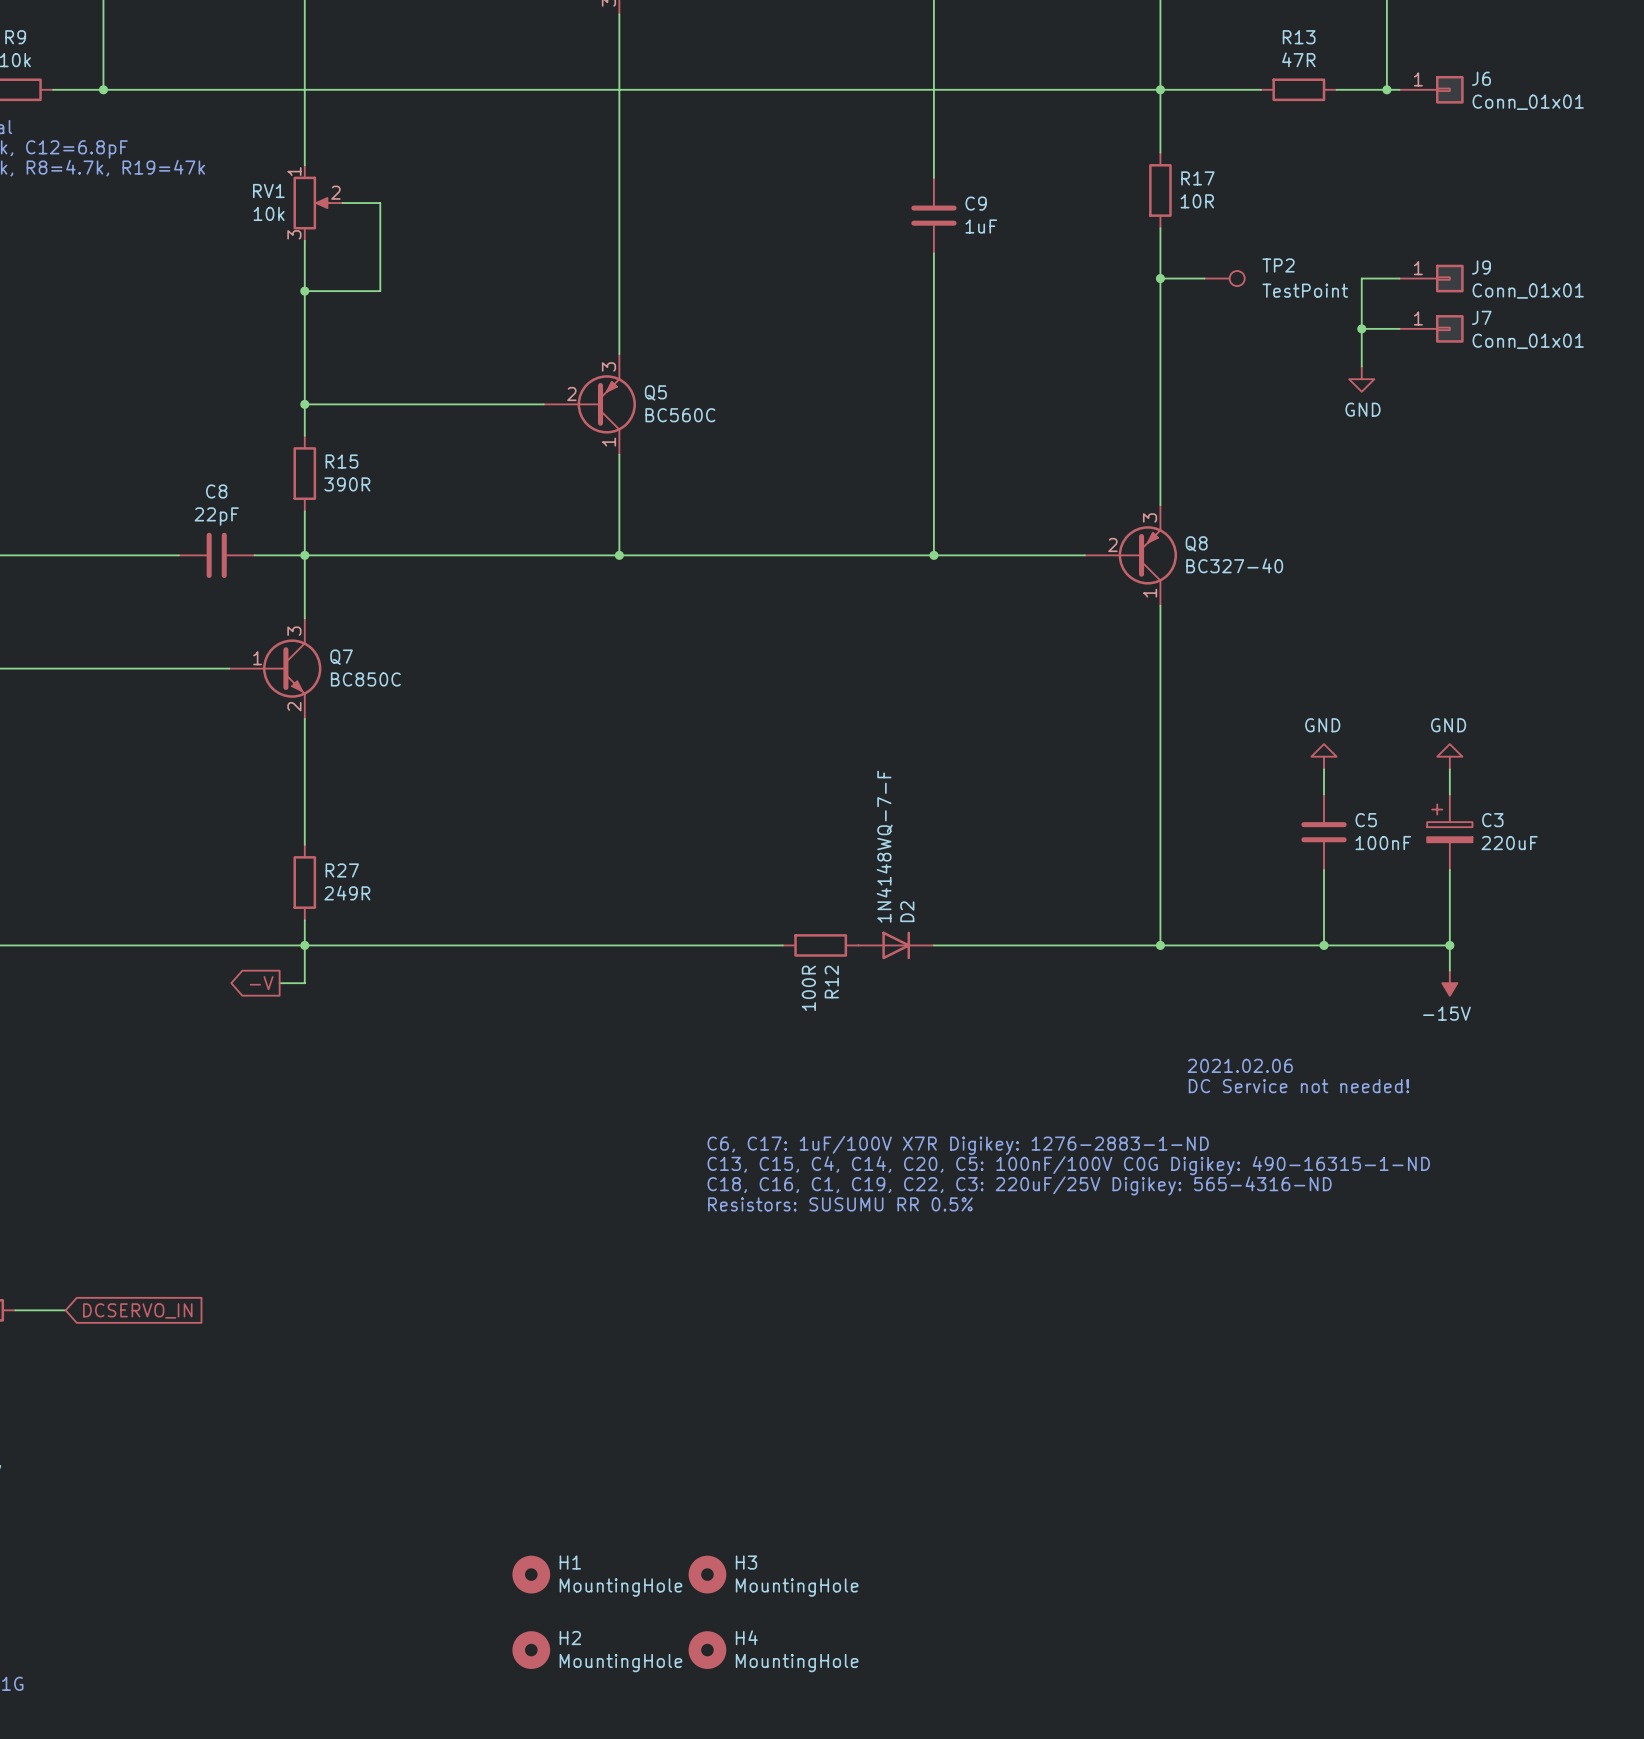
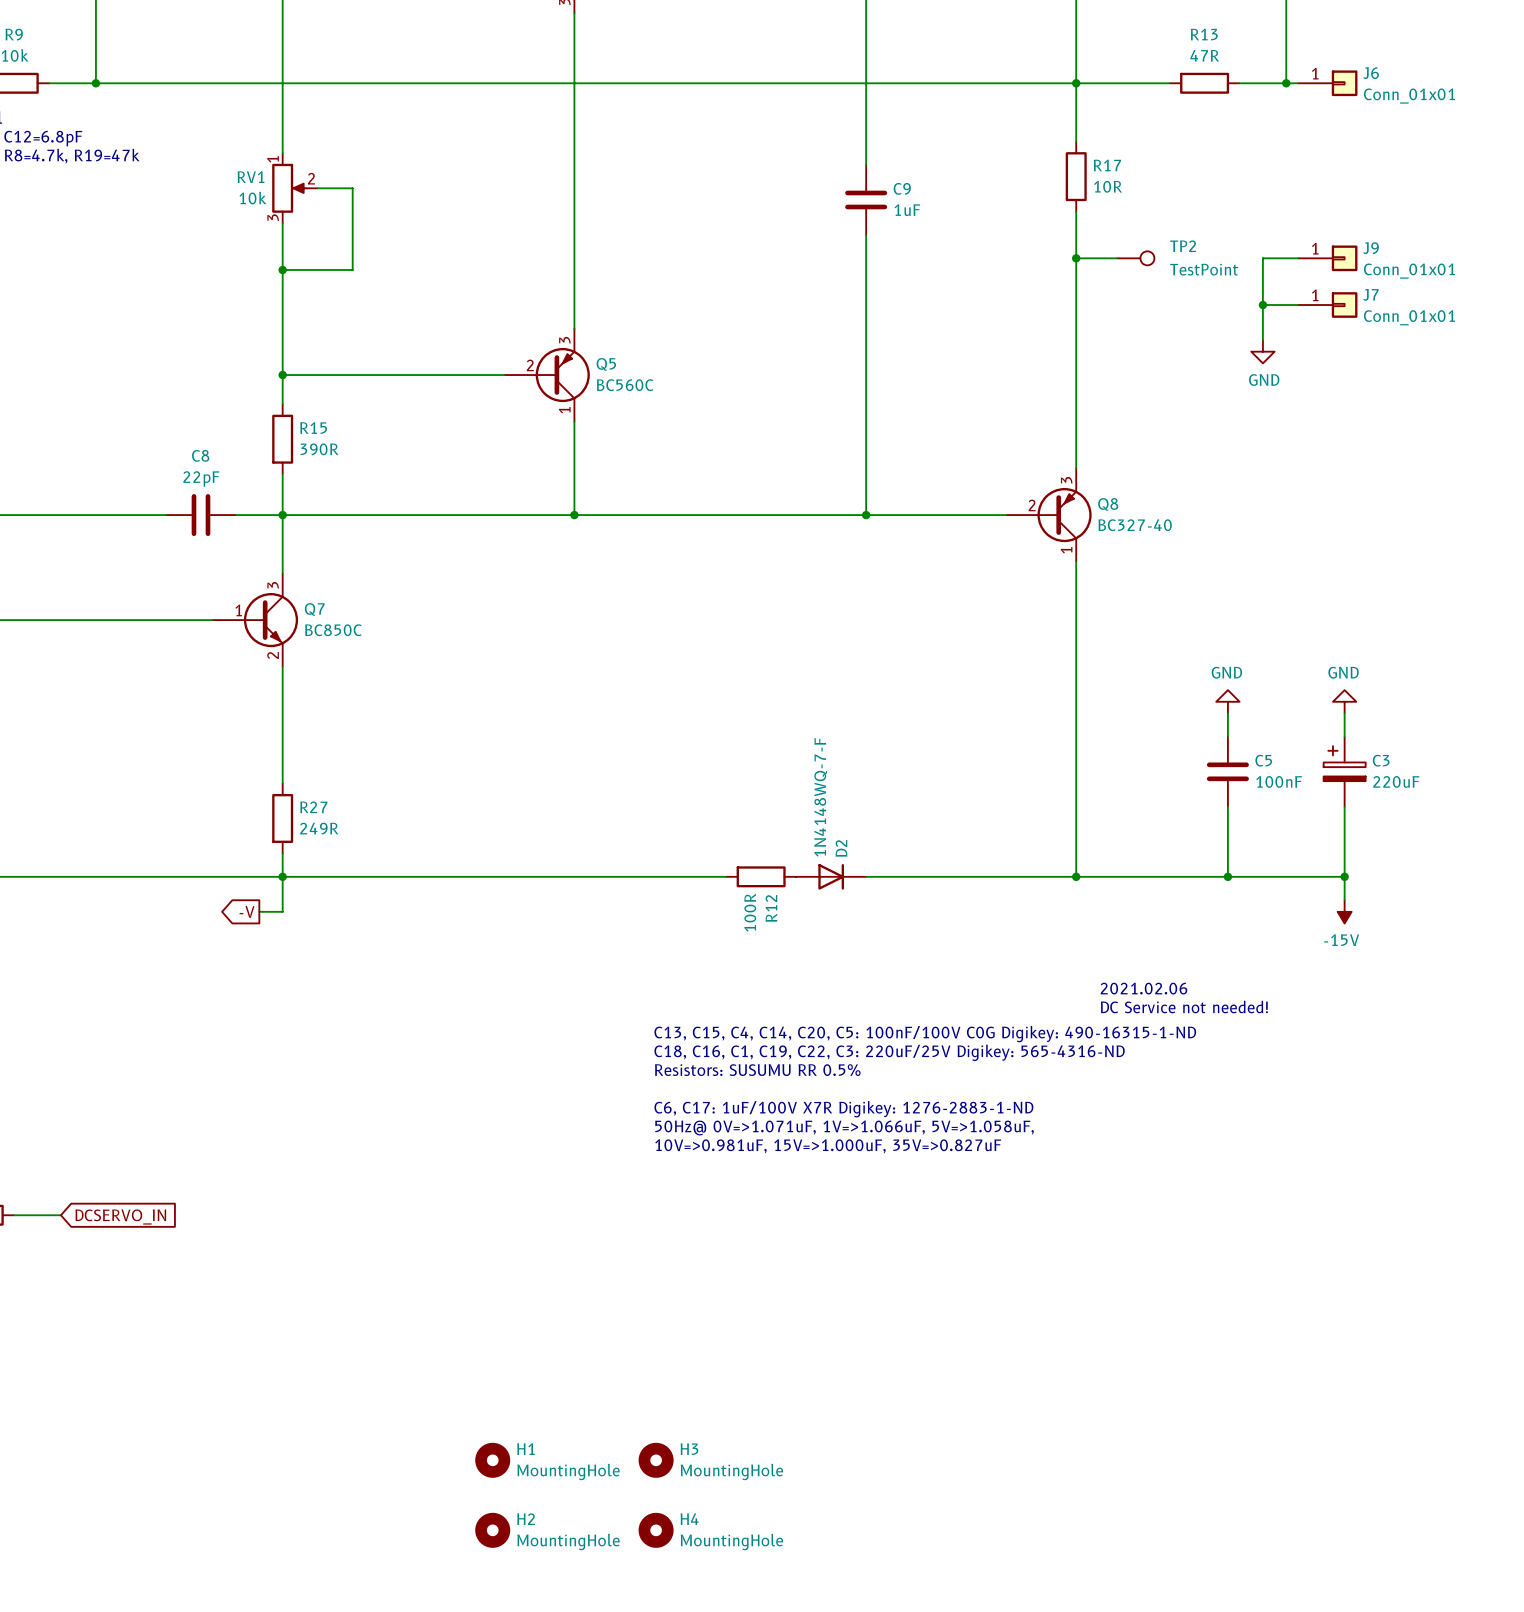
text position: C6, C17: 1uF/100V X7R Digikey: 1276-2883-1-ND (958, 1145) -> C6, C17: 1uF/100V X7R Digikey: 1276-2883-1-ND (843, 1109)
text position: C13, C15, C4, C14, C20, C5: 100nF/100V C0G Digikey: 490-16315-1-ND (1068, 1165) -> C13, C15, C4, C14, C20, C5: 100nF/100V C0G Digikey: 490-16315-1-ND (925, 1034)
text position: C18, C16, C1, C19, C22, C3: 220uF/25V Digikey: 565-4316-ND (1019, 1185) -> C18, C16, C1, C19, C22, C3: 220uF/25V Digikey: 565-4316-ND (889, 1052)
text position: Resistors: SUSUMU RR 0.5% (840, 1204) -> Resistors: SUSUMU RR 0.5% (757, 1070)
text: none -> 50Hz@ 0V=>1.071uF, 1V=>1.066uF, 5V=>1.058uF, (844, 1128)
text: none -> 10V=>0.981uF, 15V=>1.000uF, 35V=>0.827uF (828, 1146)

